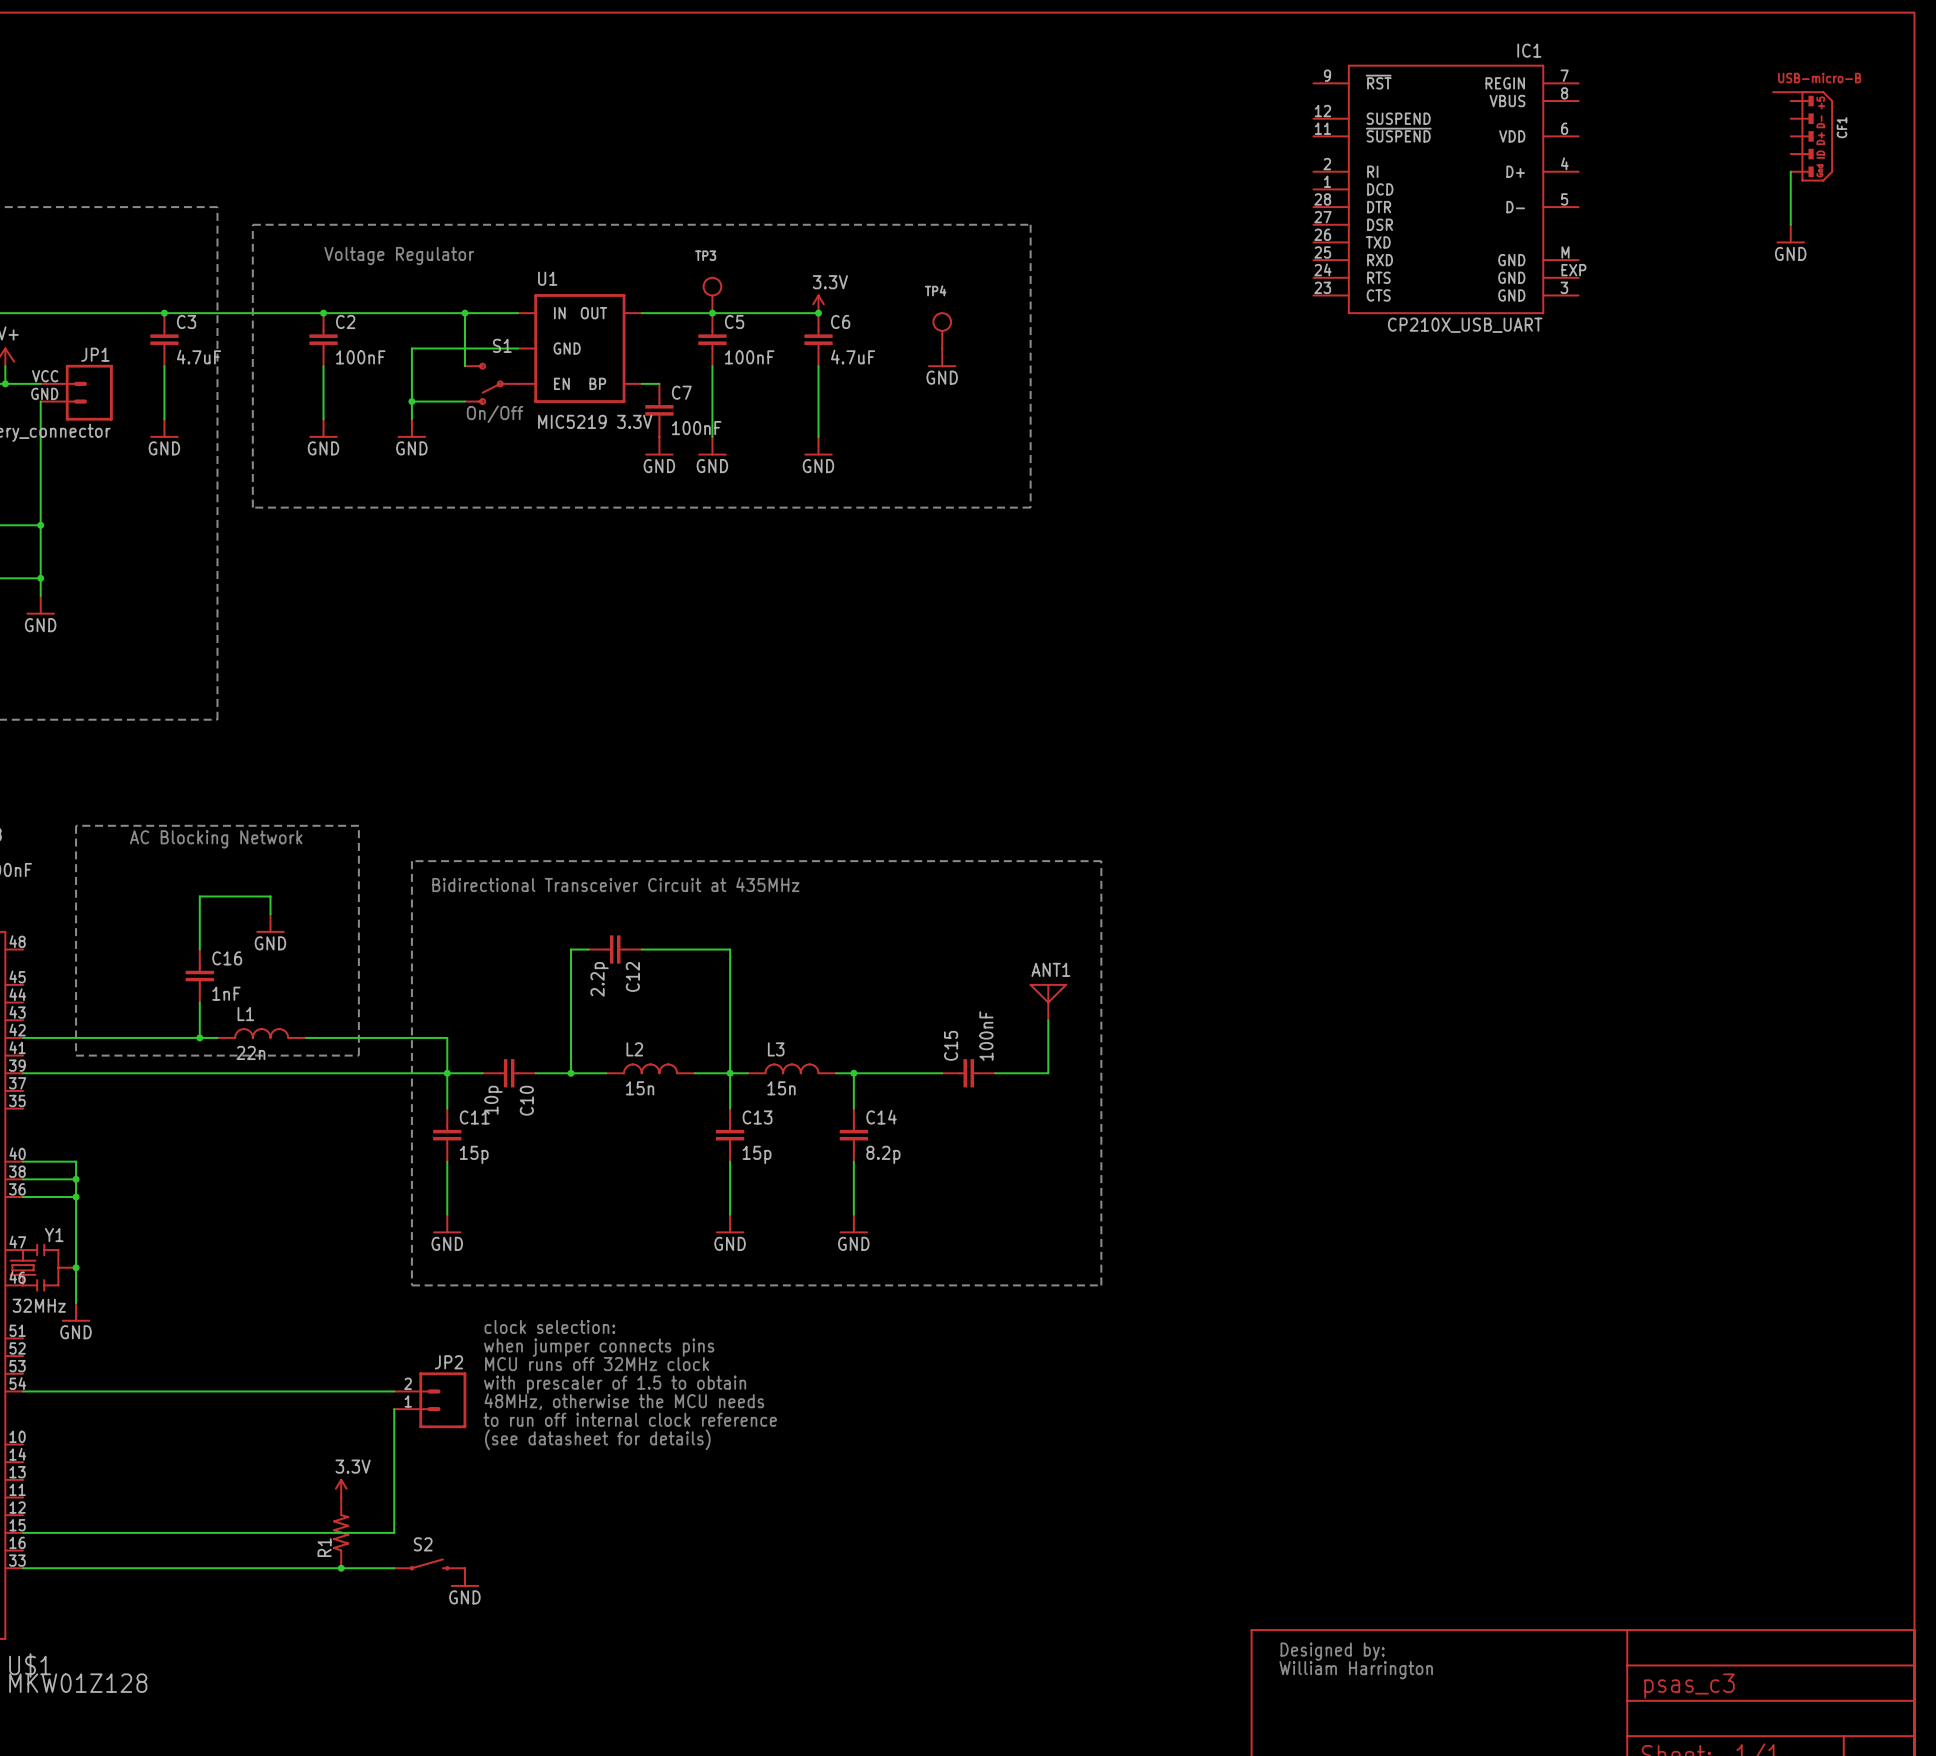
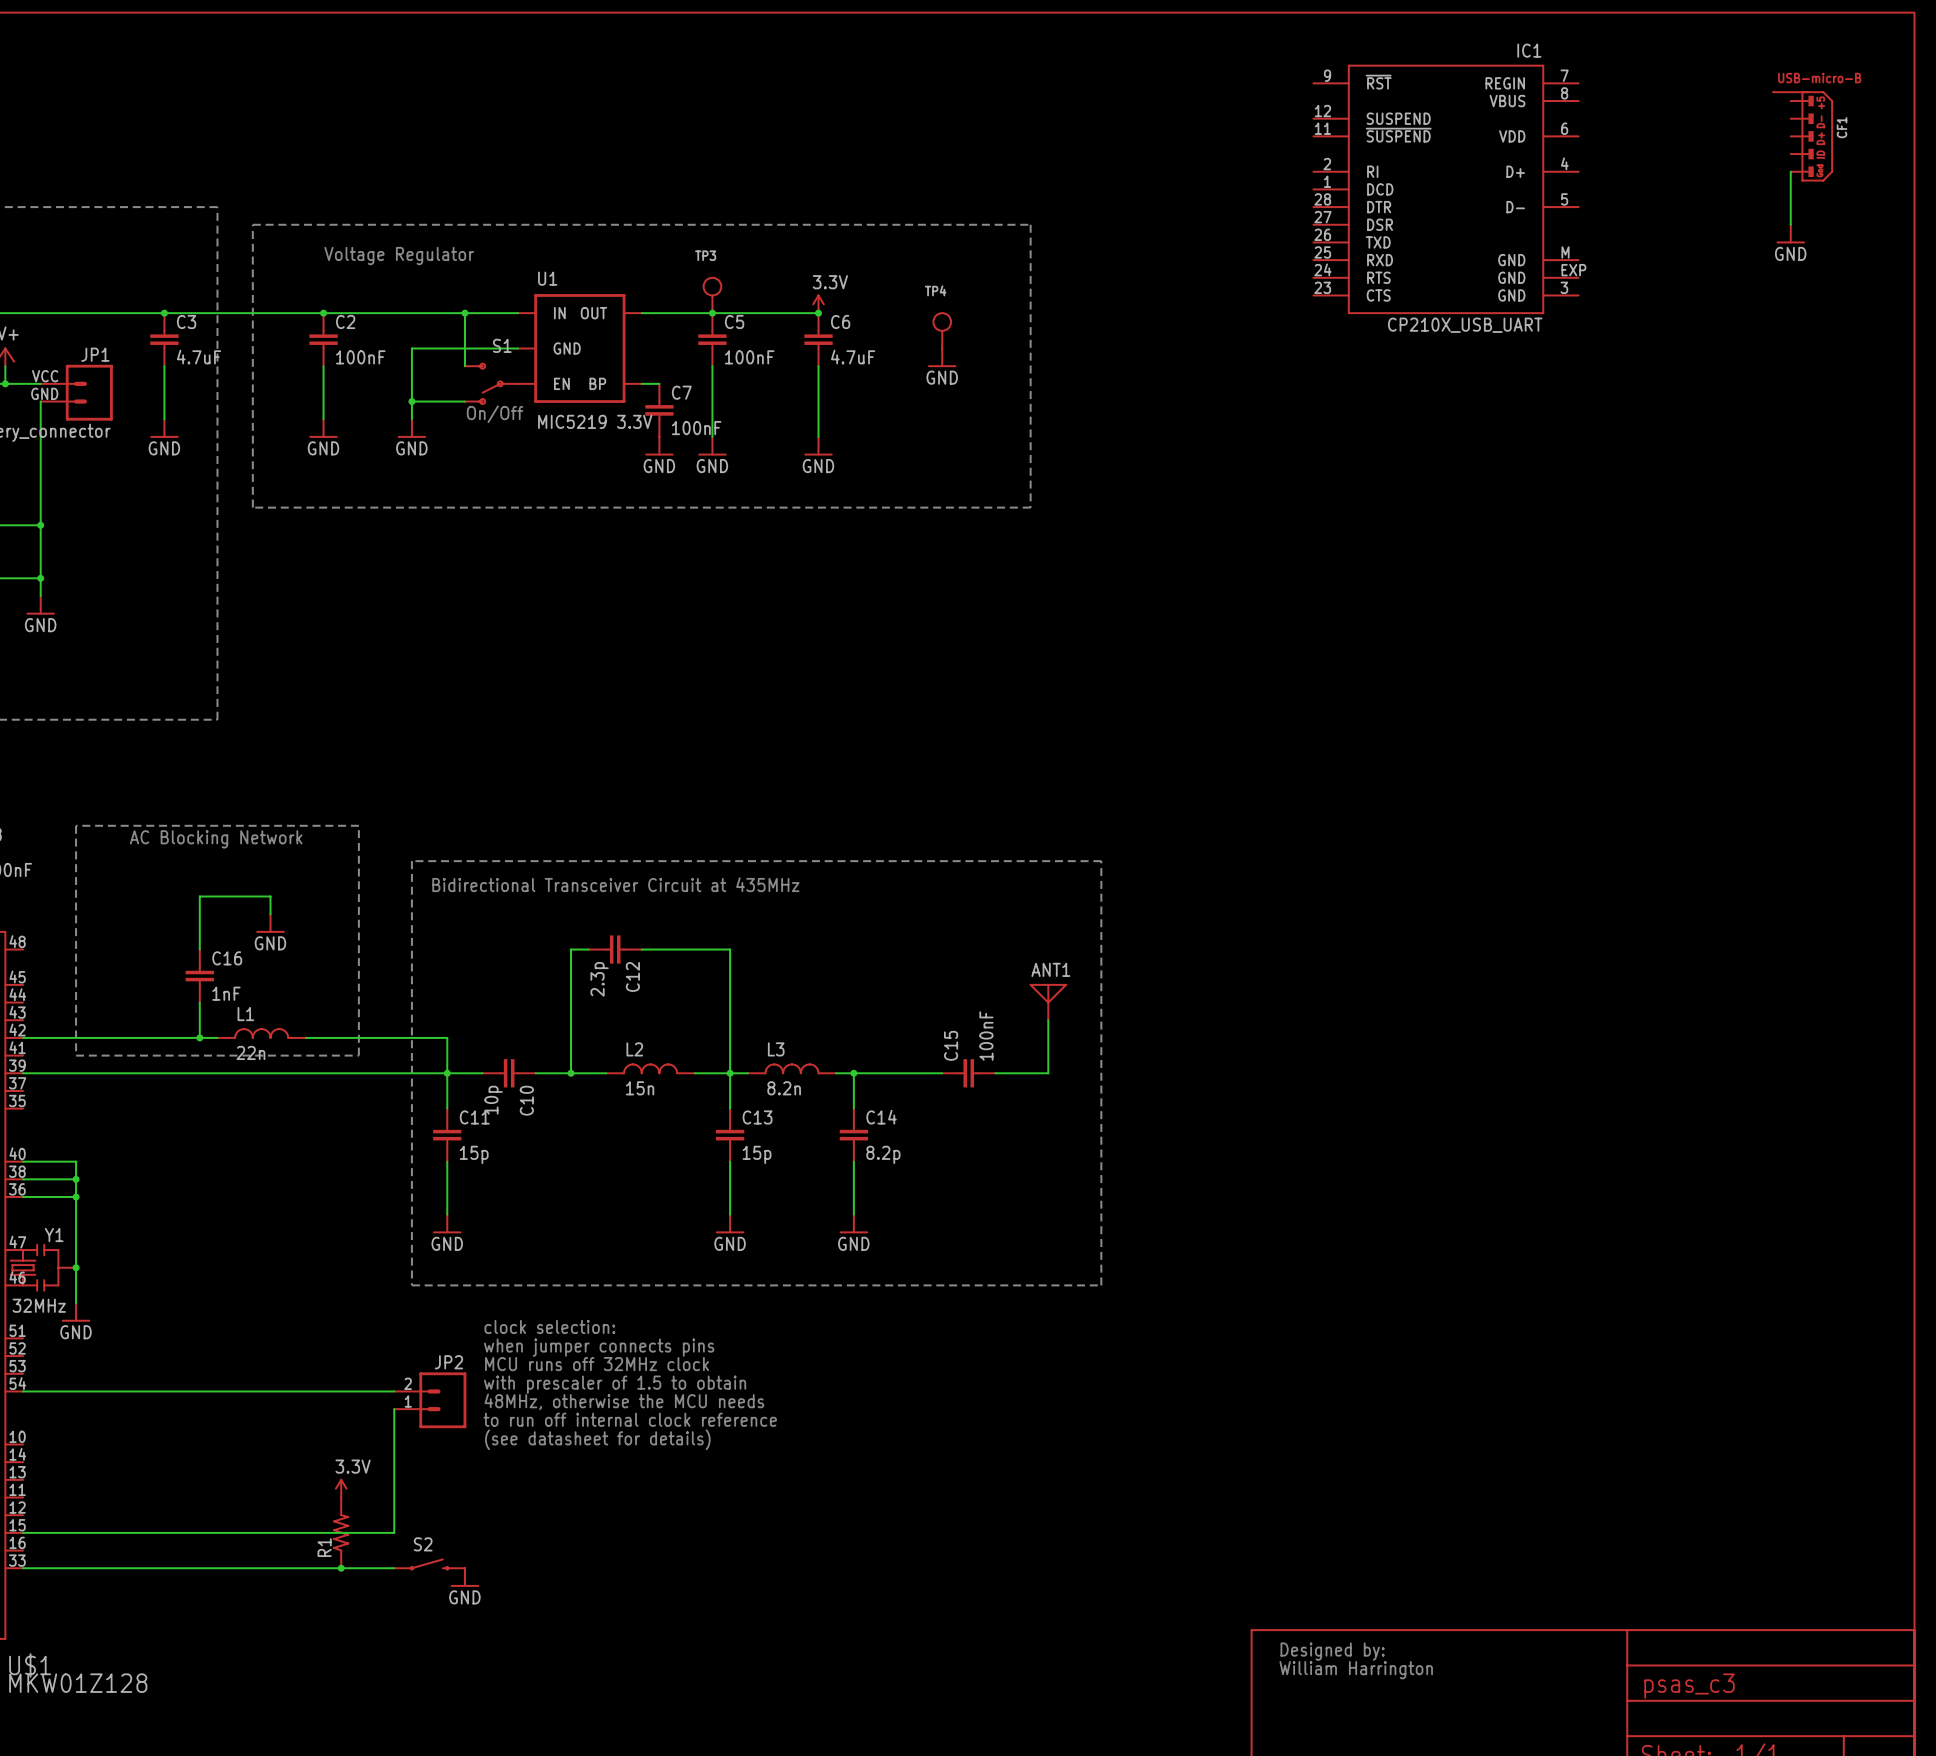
C12 value: 2.2p (599, 979) -> 2.3p (599, 979)
L3 value: 15n (781, 1088) -> 8.2n (784, 1088)

